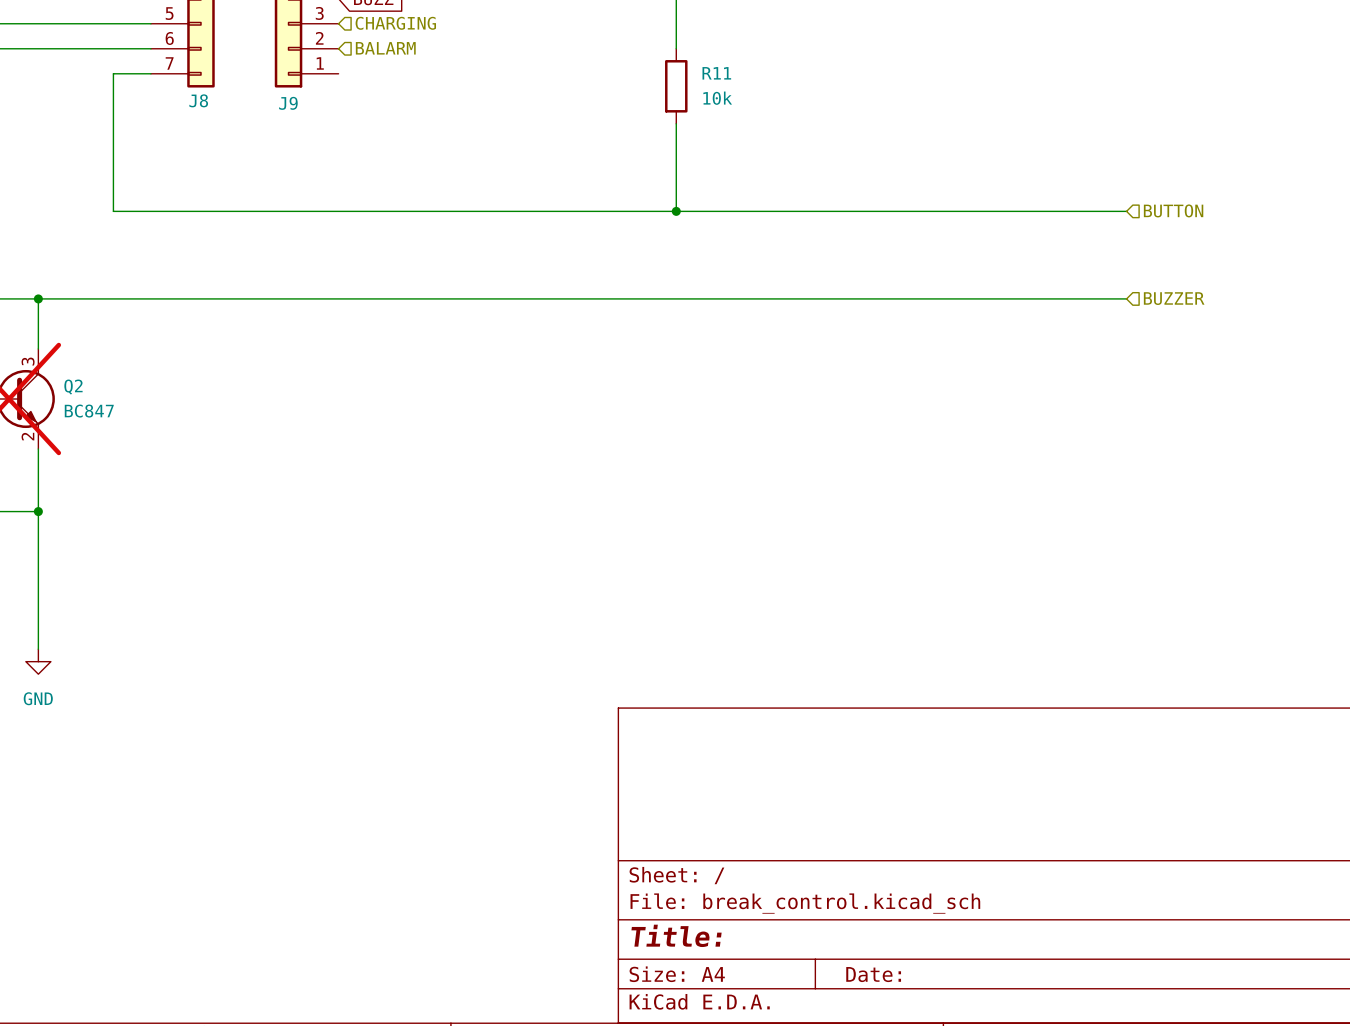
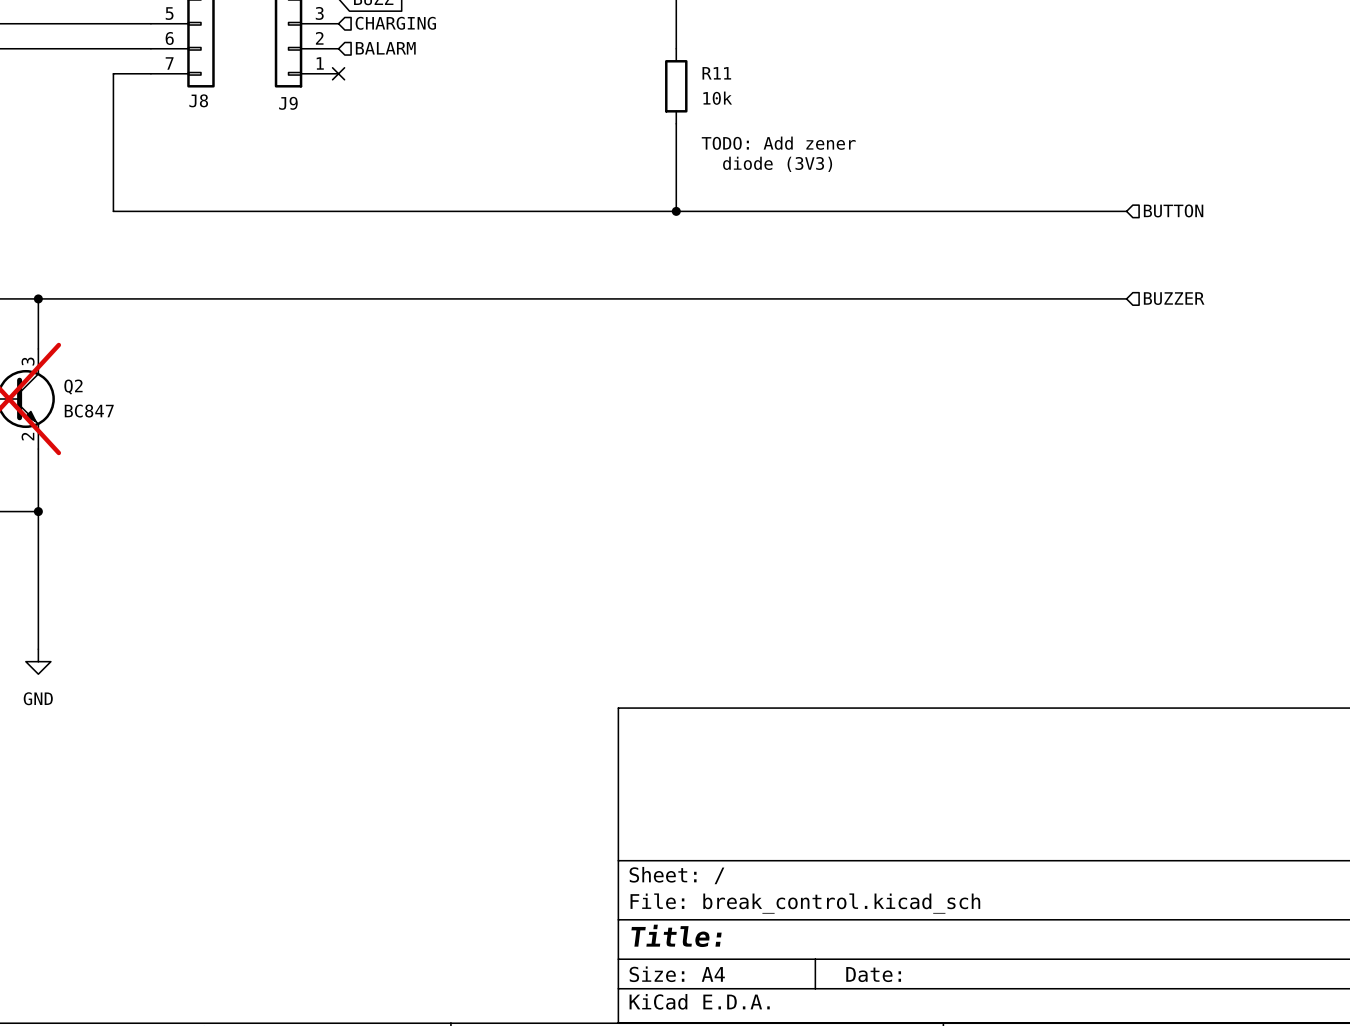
no-connect mark: none -> (338, 73)
text: none -> TODO: Add zener (778, 143)
text: none -> diode (3V3) (777, 164)

